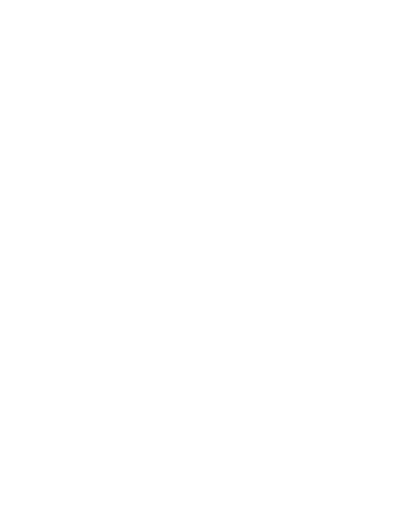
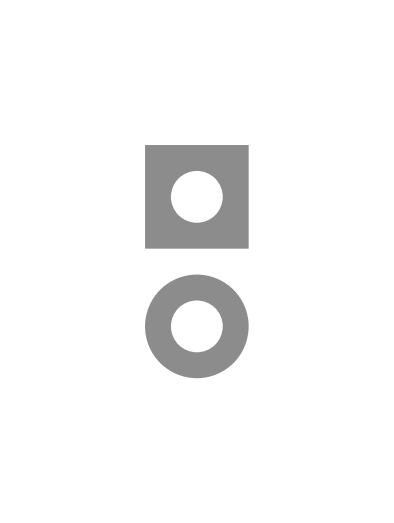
part: none -> (196, 261)

